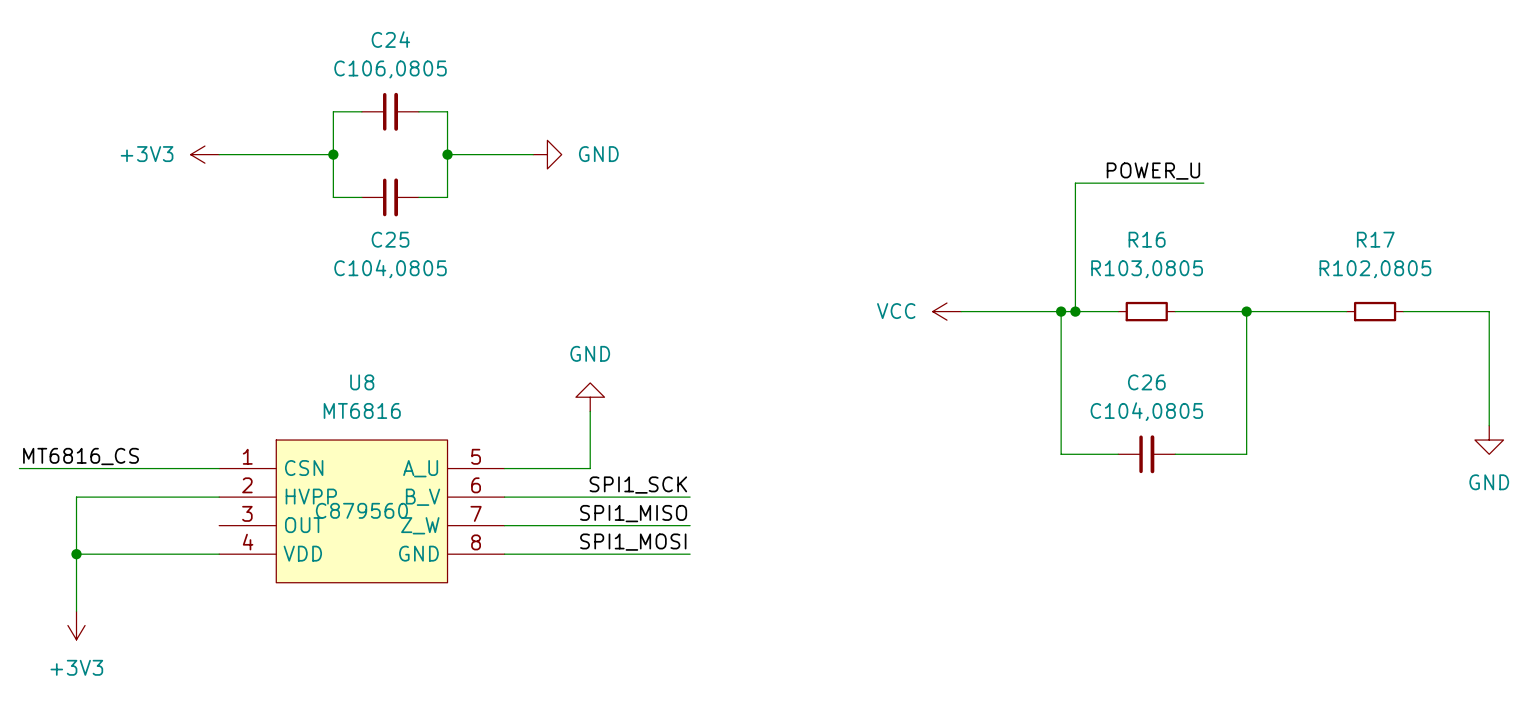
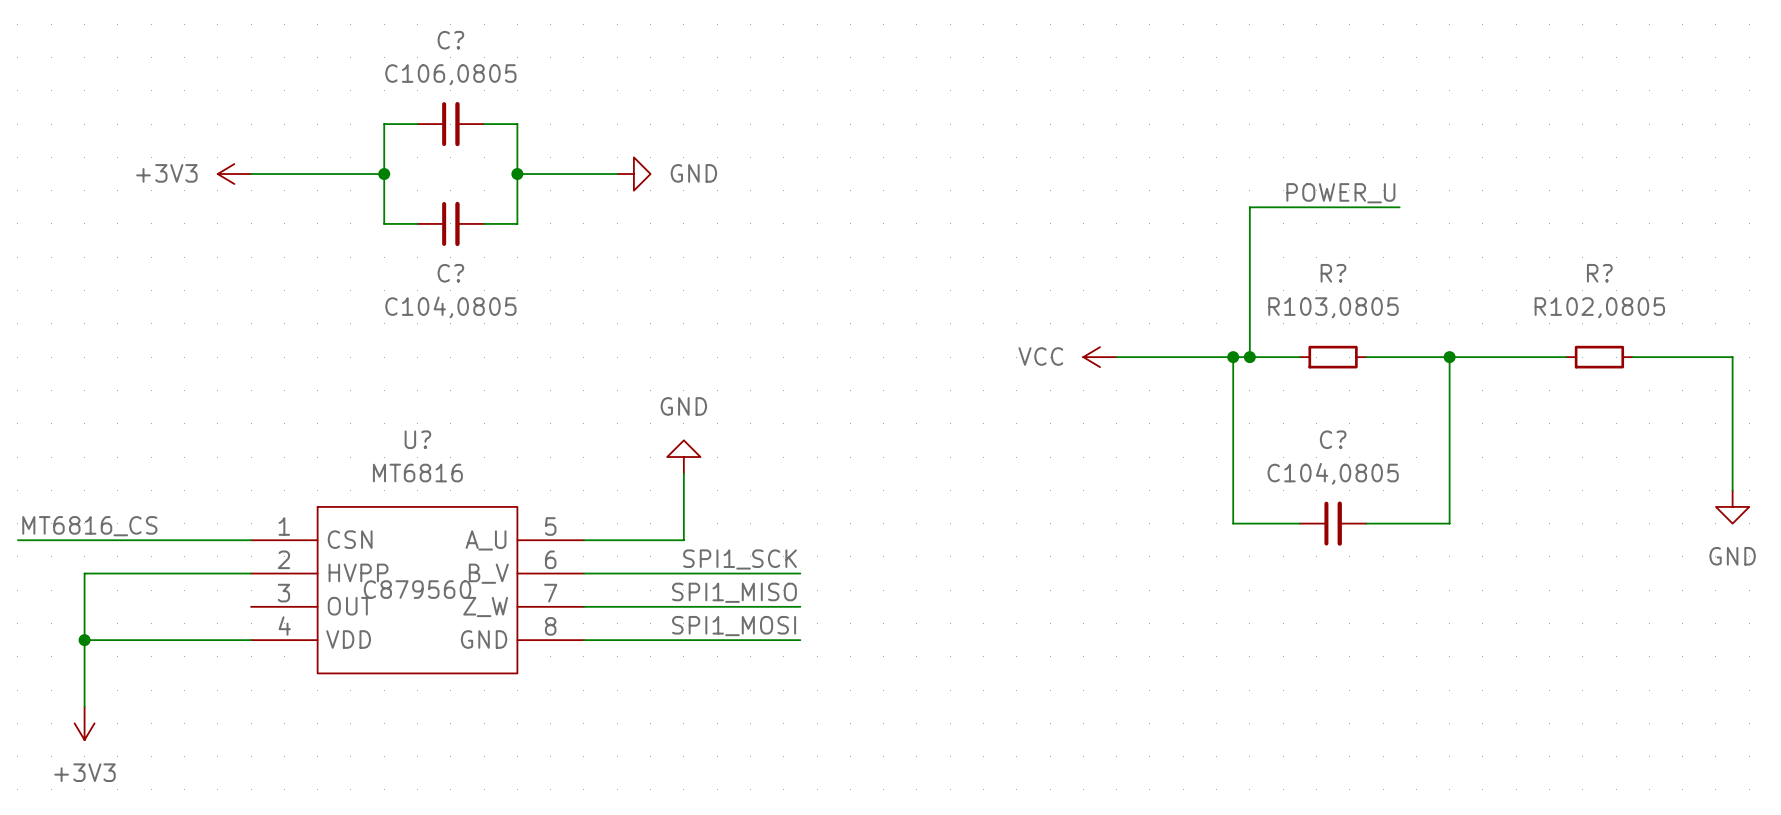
C24 name: C24 (390, 39) -> C? (450, 40)
C25 name: C25 (390, 239) -> C? (450, 273)
R16 name: R16 (1147, 239) -> R? (1333, 273)
R17 name: R17 (1375, 239) -> R? (1599, 273)
U8 name: U8 (362, 382) -> U? (417, 439)
C26 name: C26 (1146, 382) -> C? (1333, 439)

